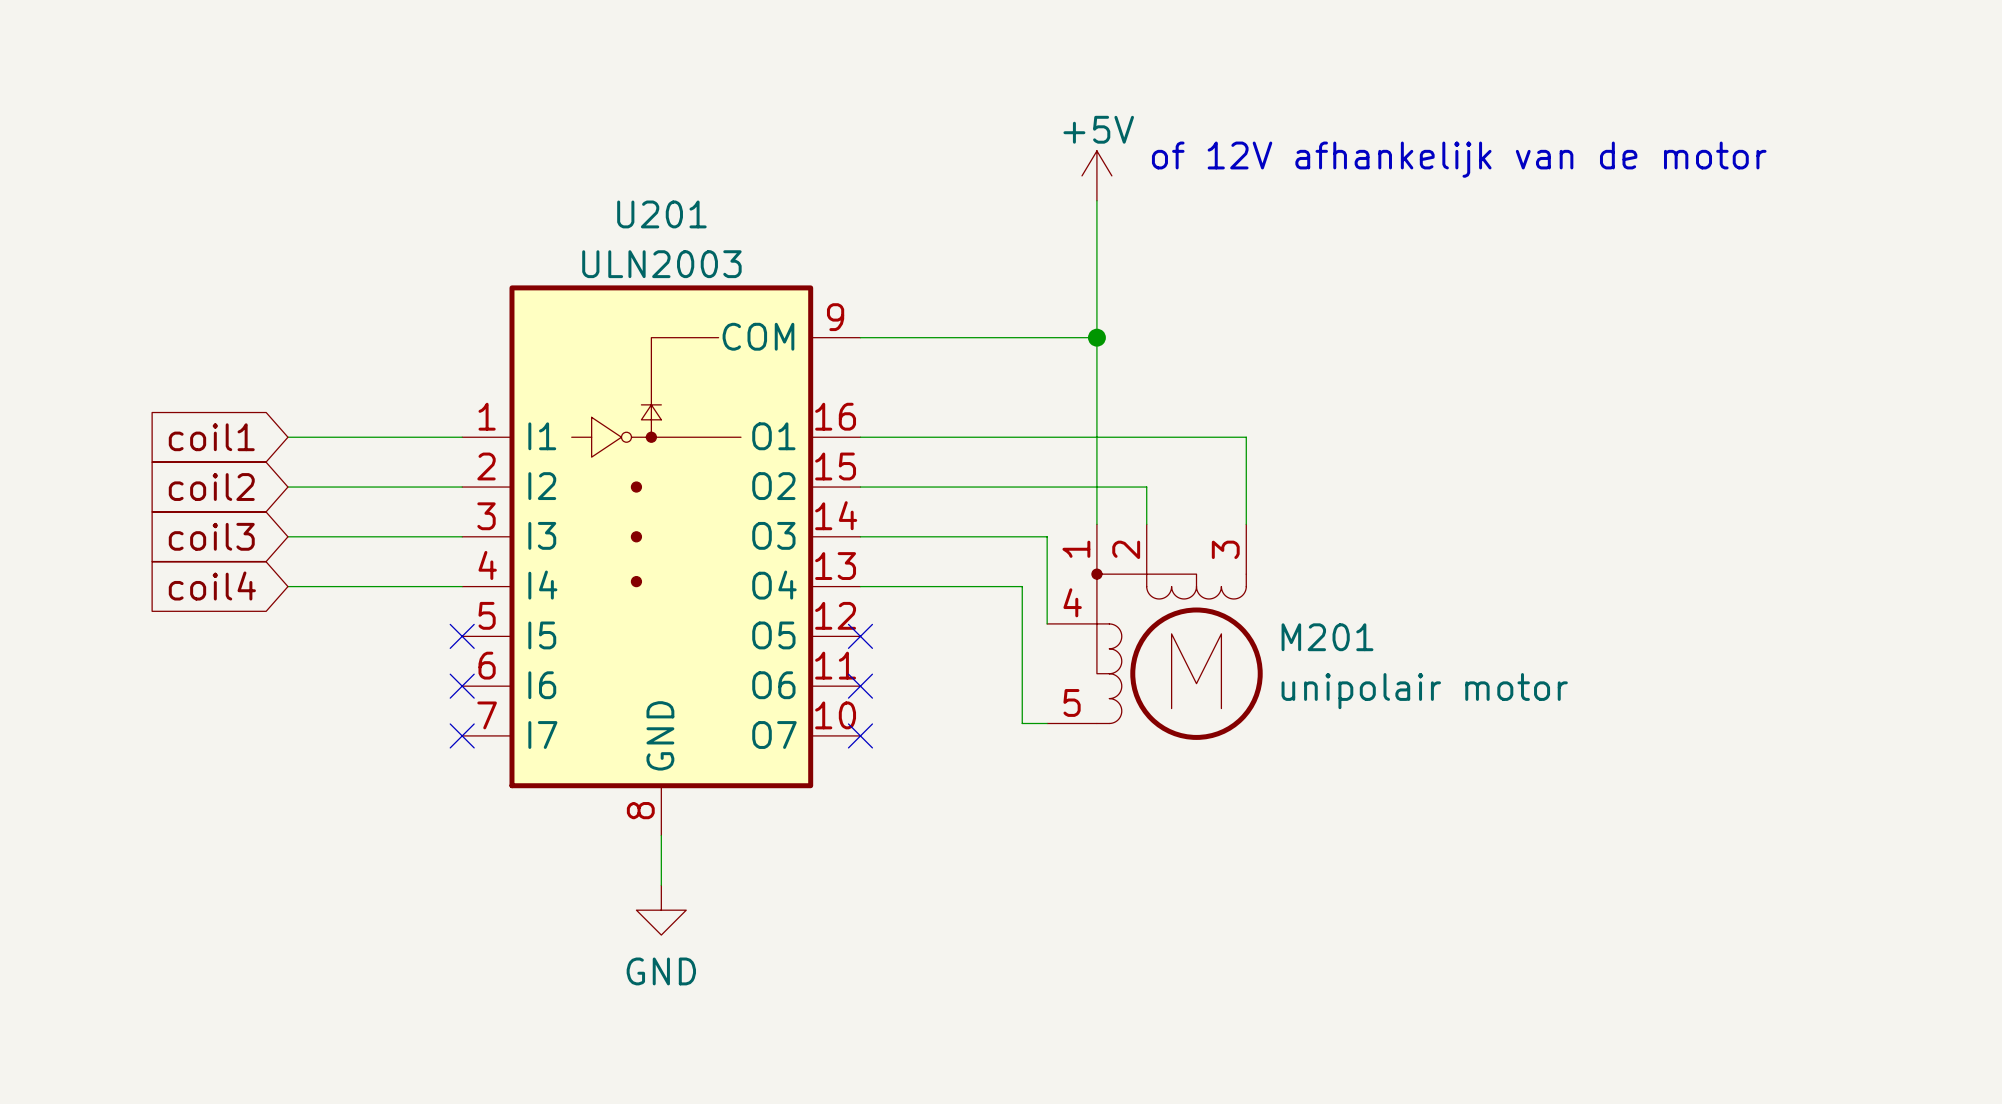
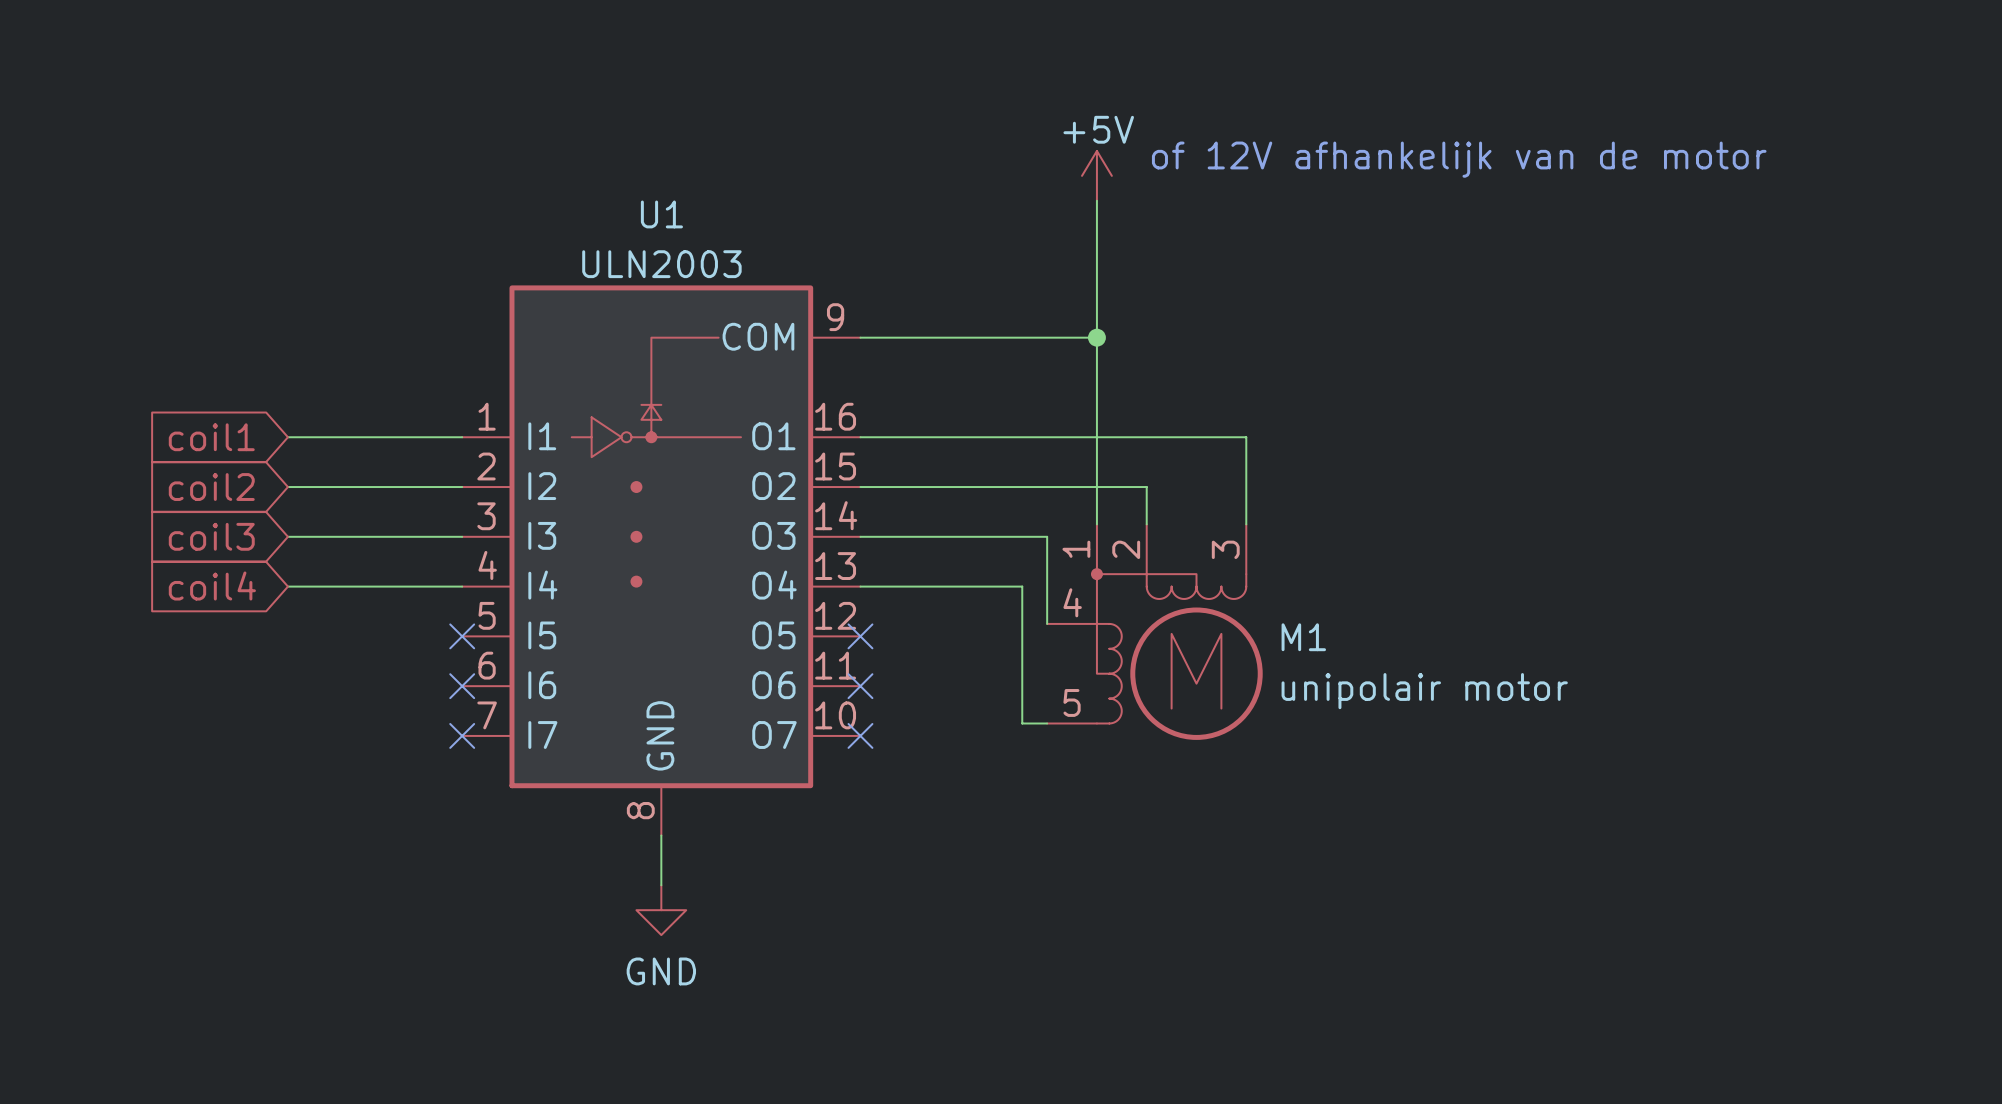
U201 name: U201 (661, 214) -> U1 (661, 214)
M201 name: M201 (1327, 637) -> M1 (1303, 637)

